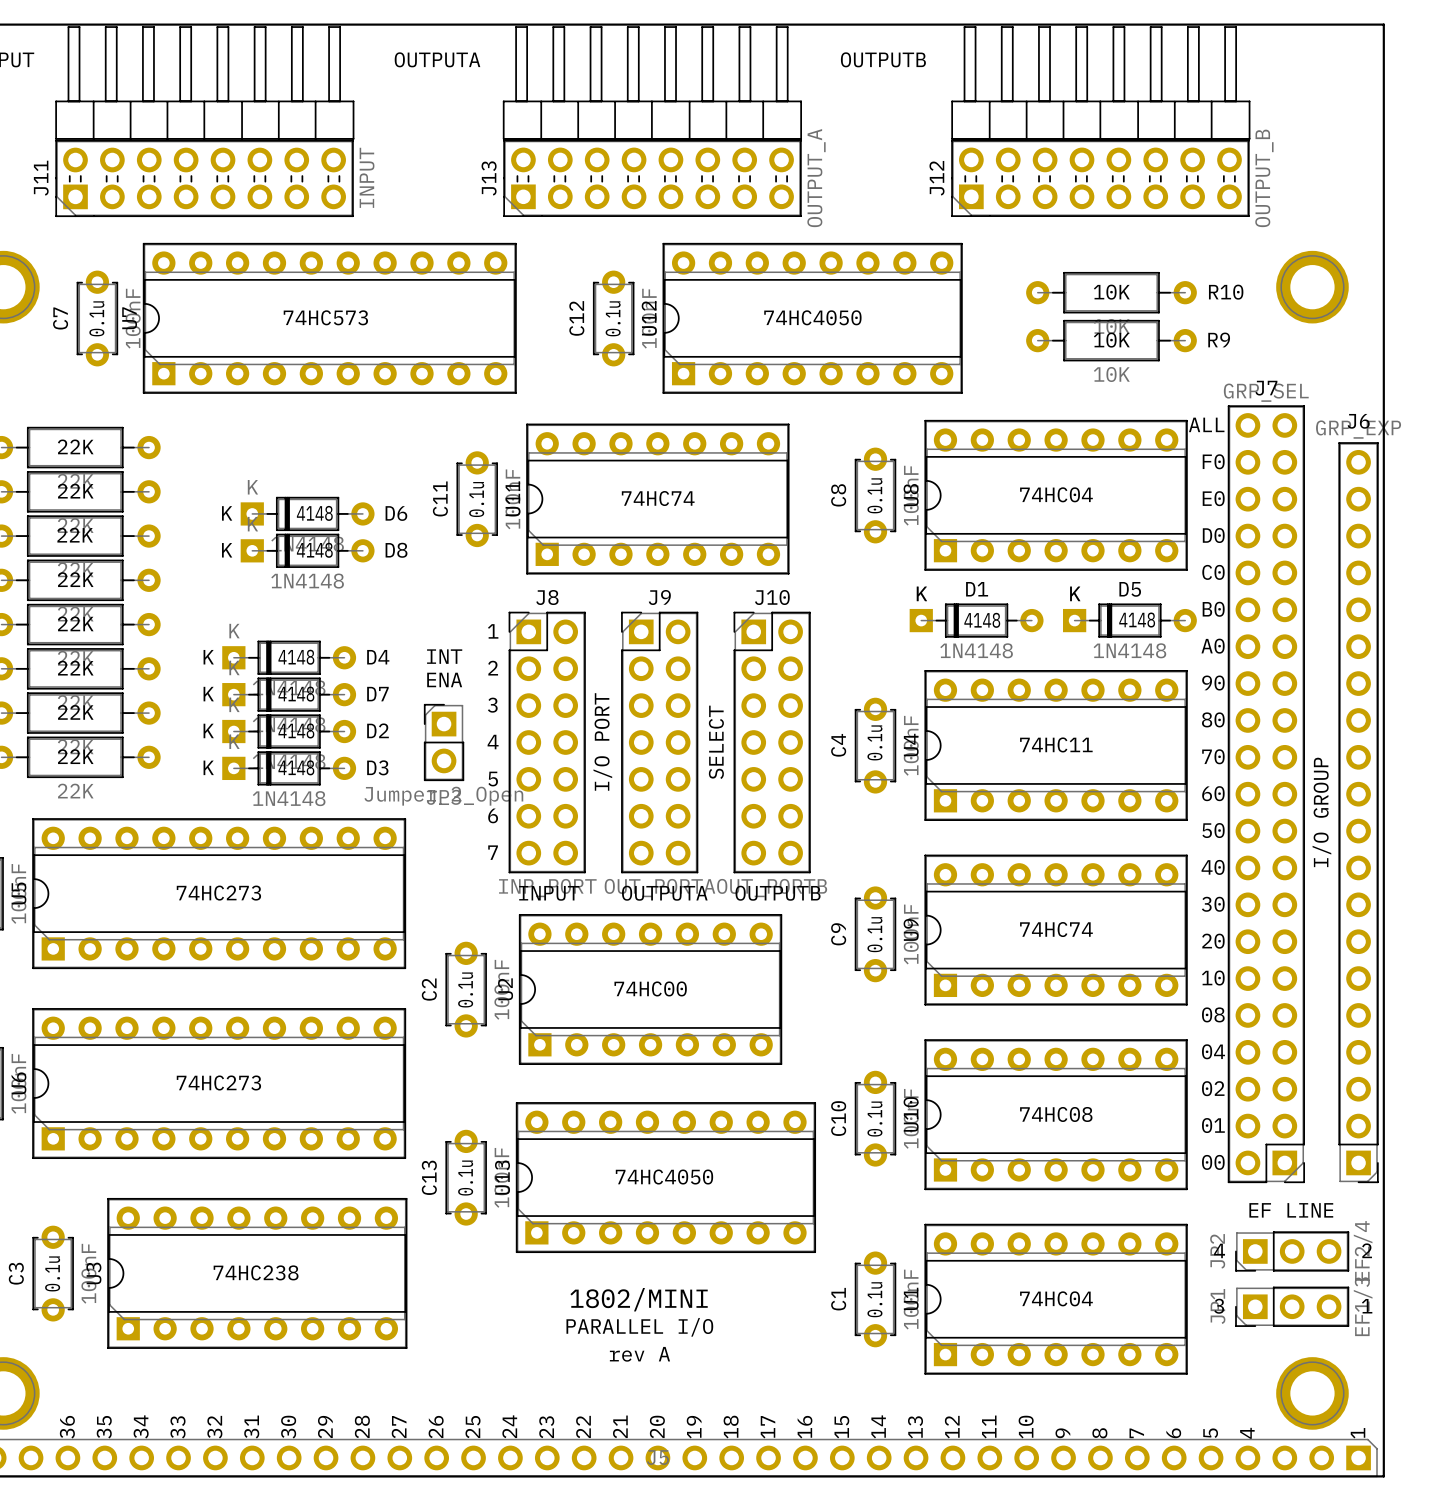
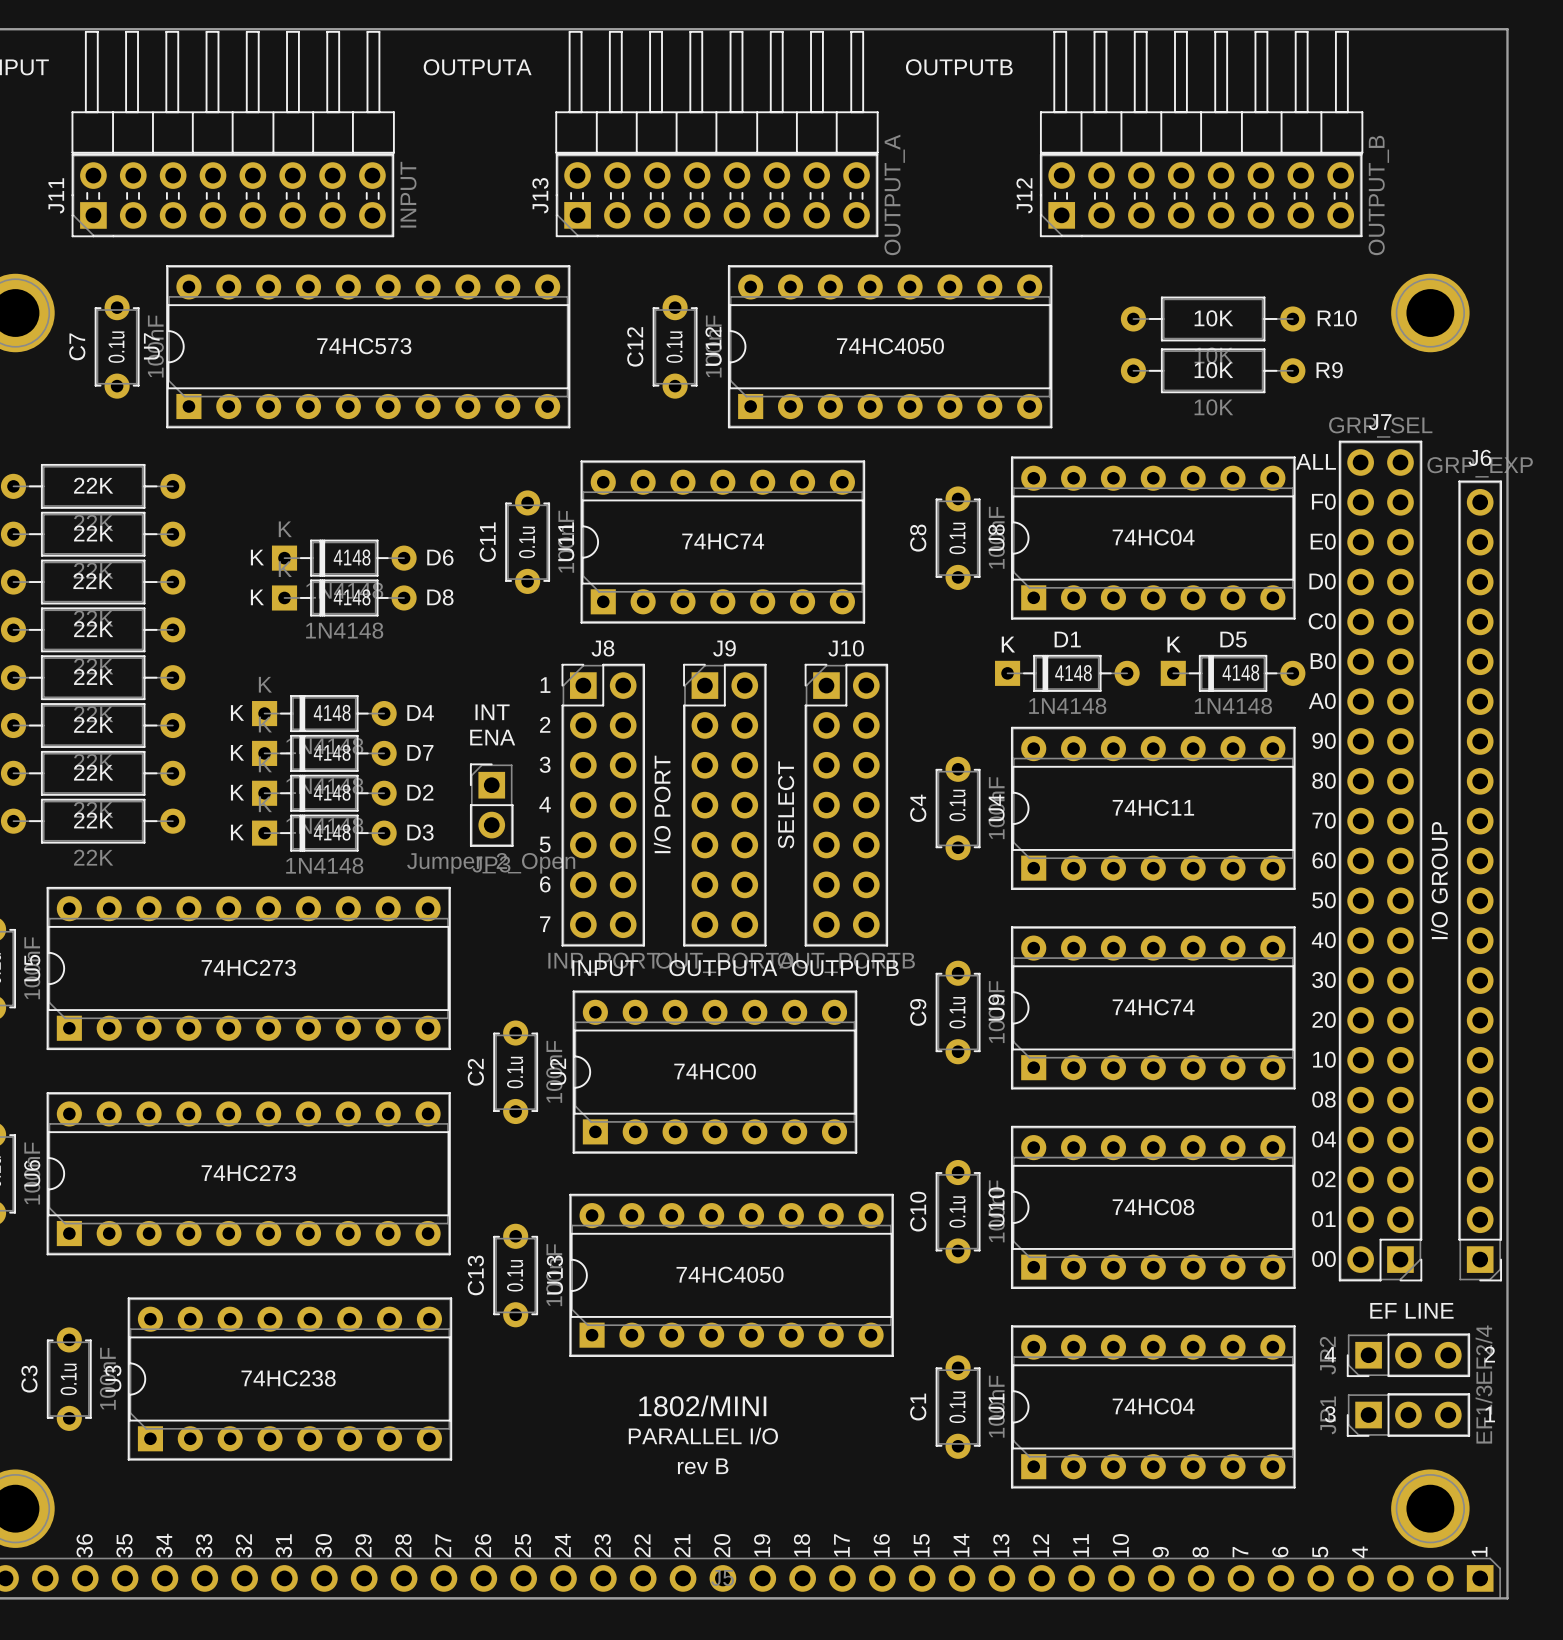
text: rev A (639, 1354) -> rev B (703, 1466)

